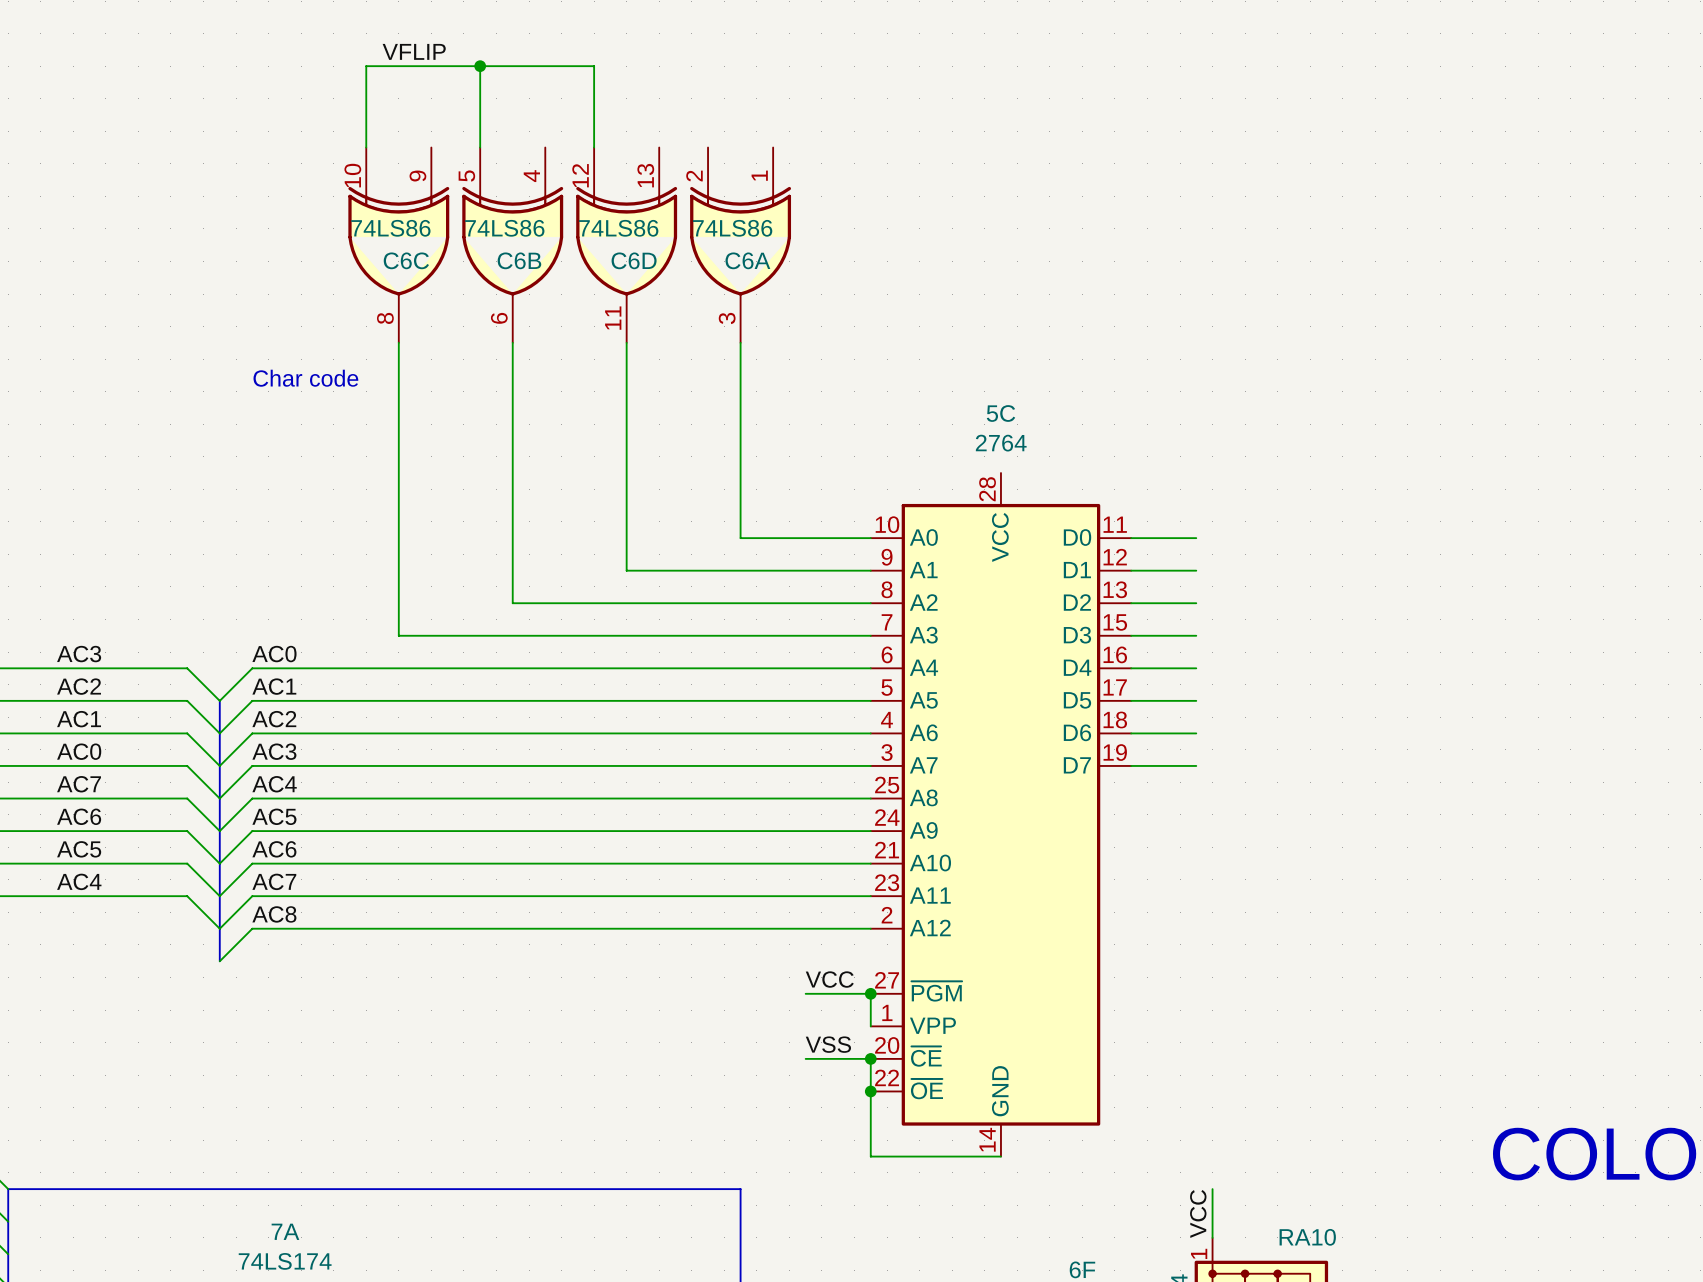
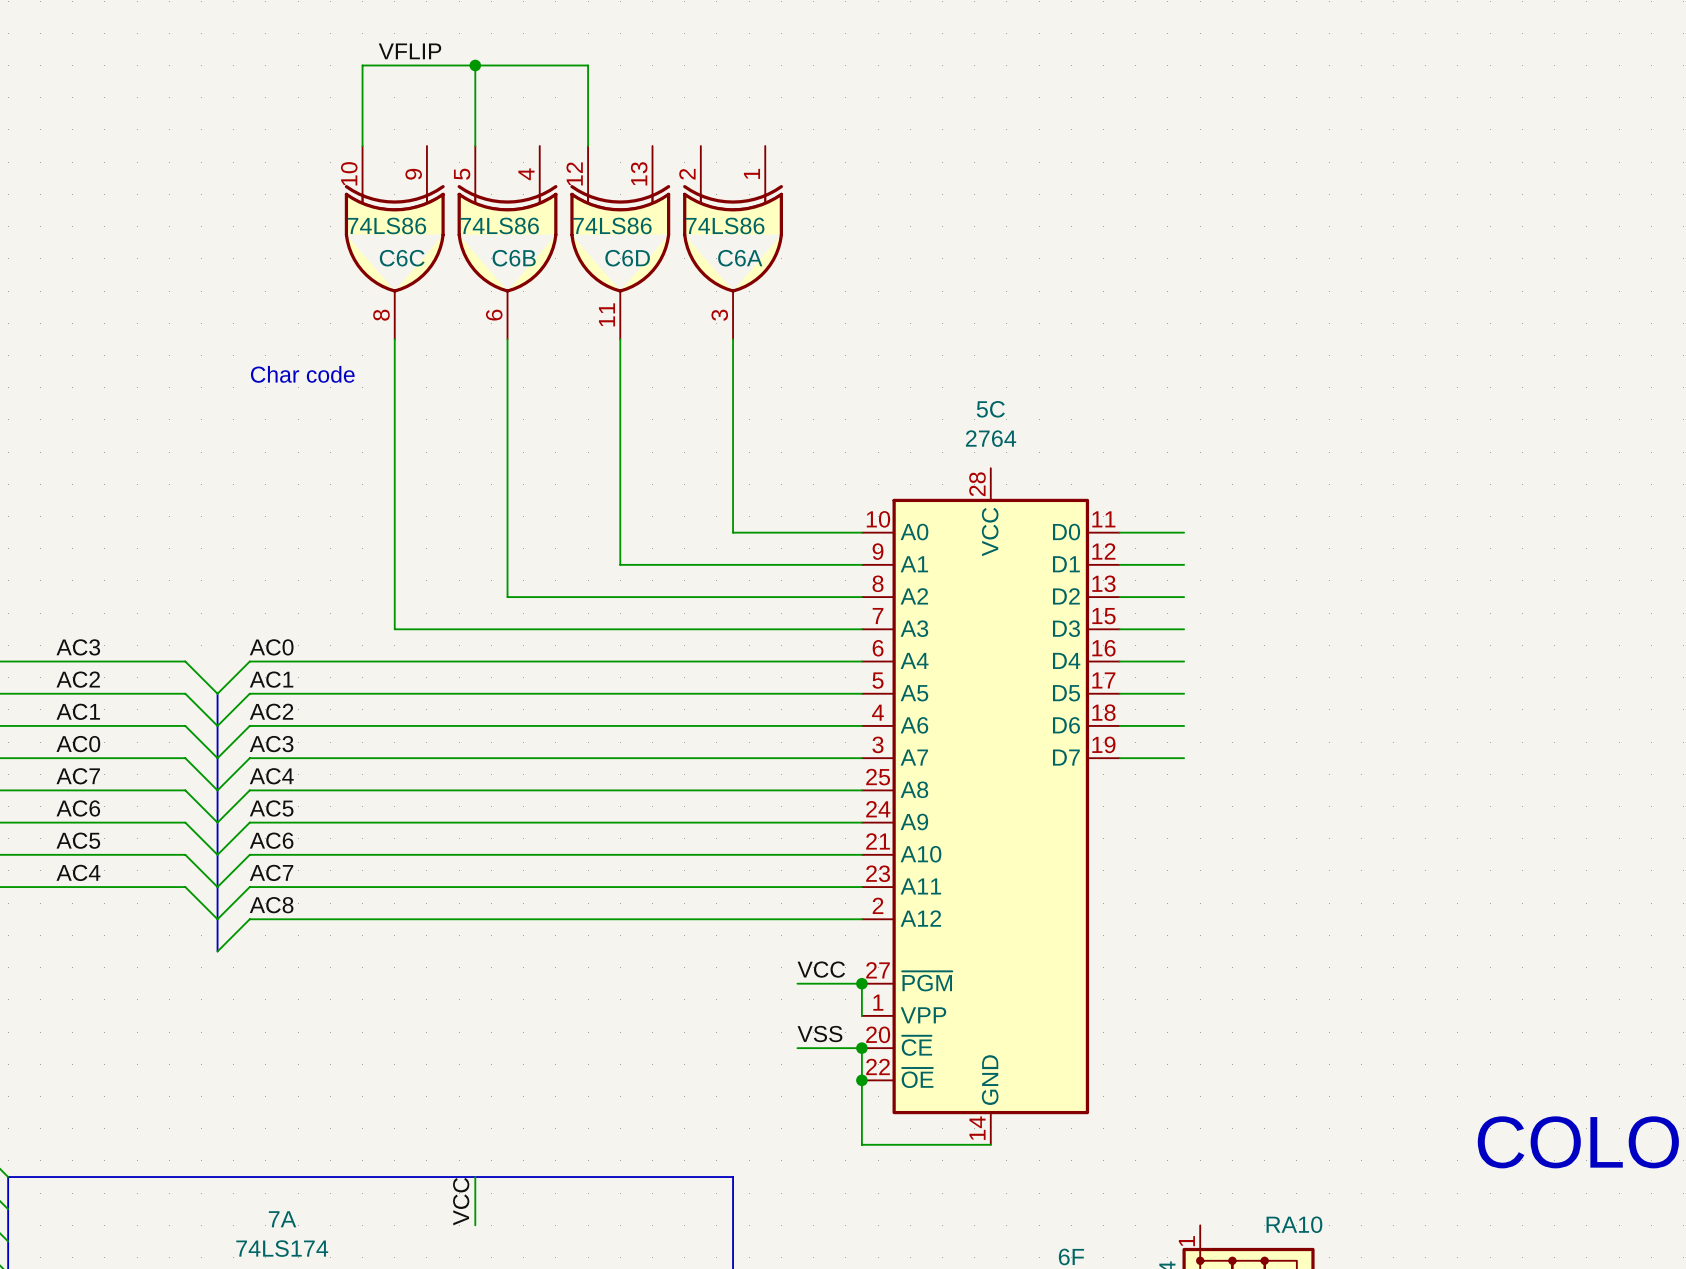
wire: none -> (475, 1177) (475, 1225)
wire: (1212, 1189) (1212, 1237) -> none
label: none -> VCC (461, 1201)
label: VCC (1198, 1213) -> none

